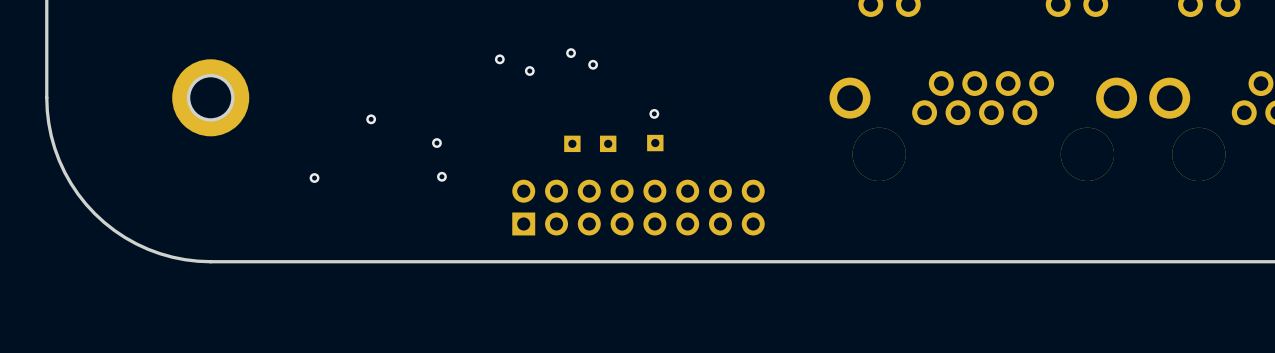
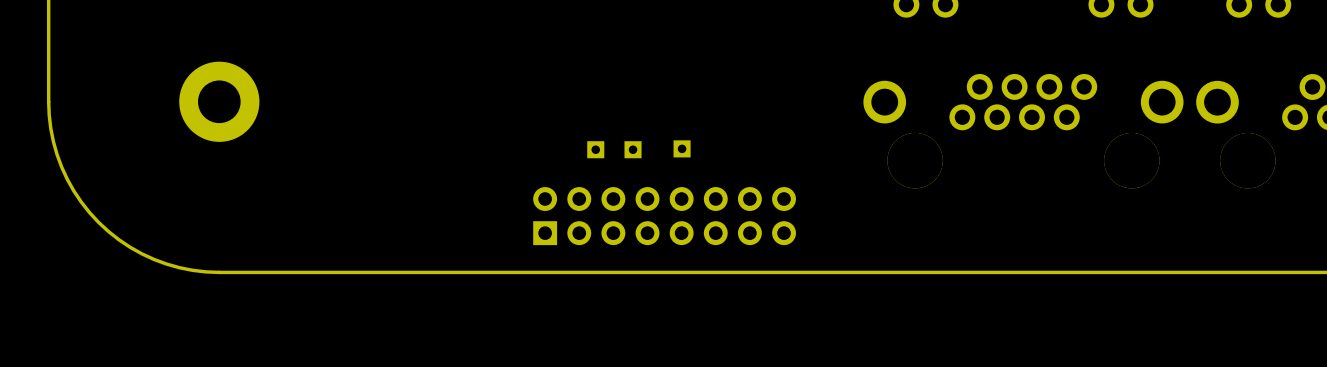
via: (571, 53) -> none
via: (499, 59) -> none
via: (593, 64) -> none
via: (529, 71) -> none
via: (654, 113) -> none
via: (371, 119) -> none
via: (436, 143) -> none
via: (441, 176) -> none
via: (314, 178) -> none

